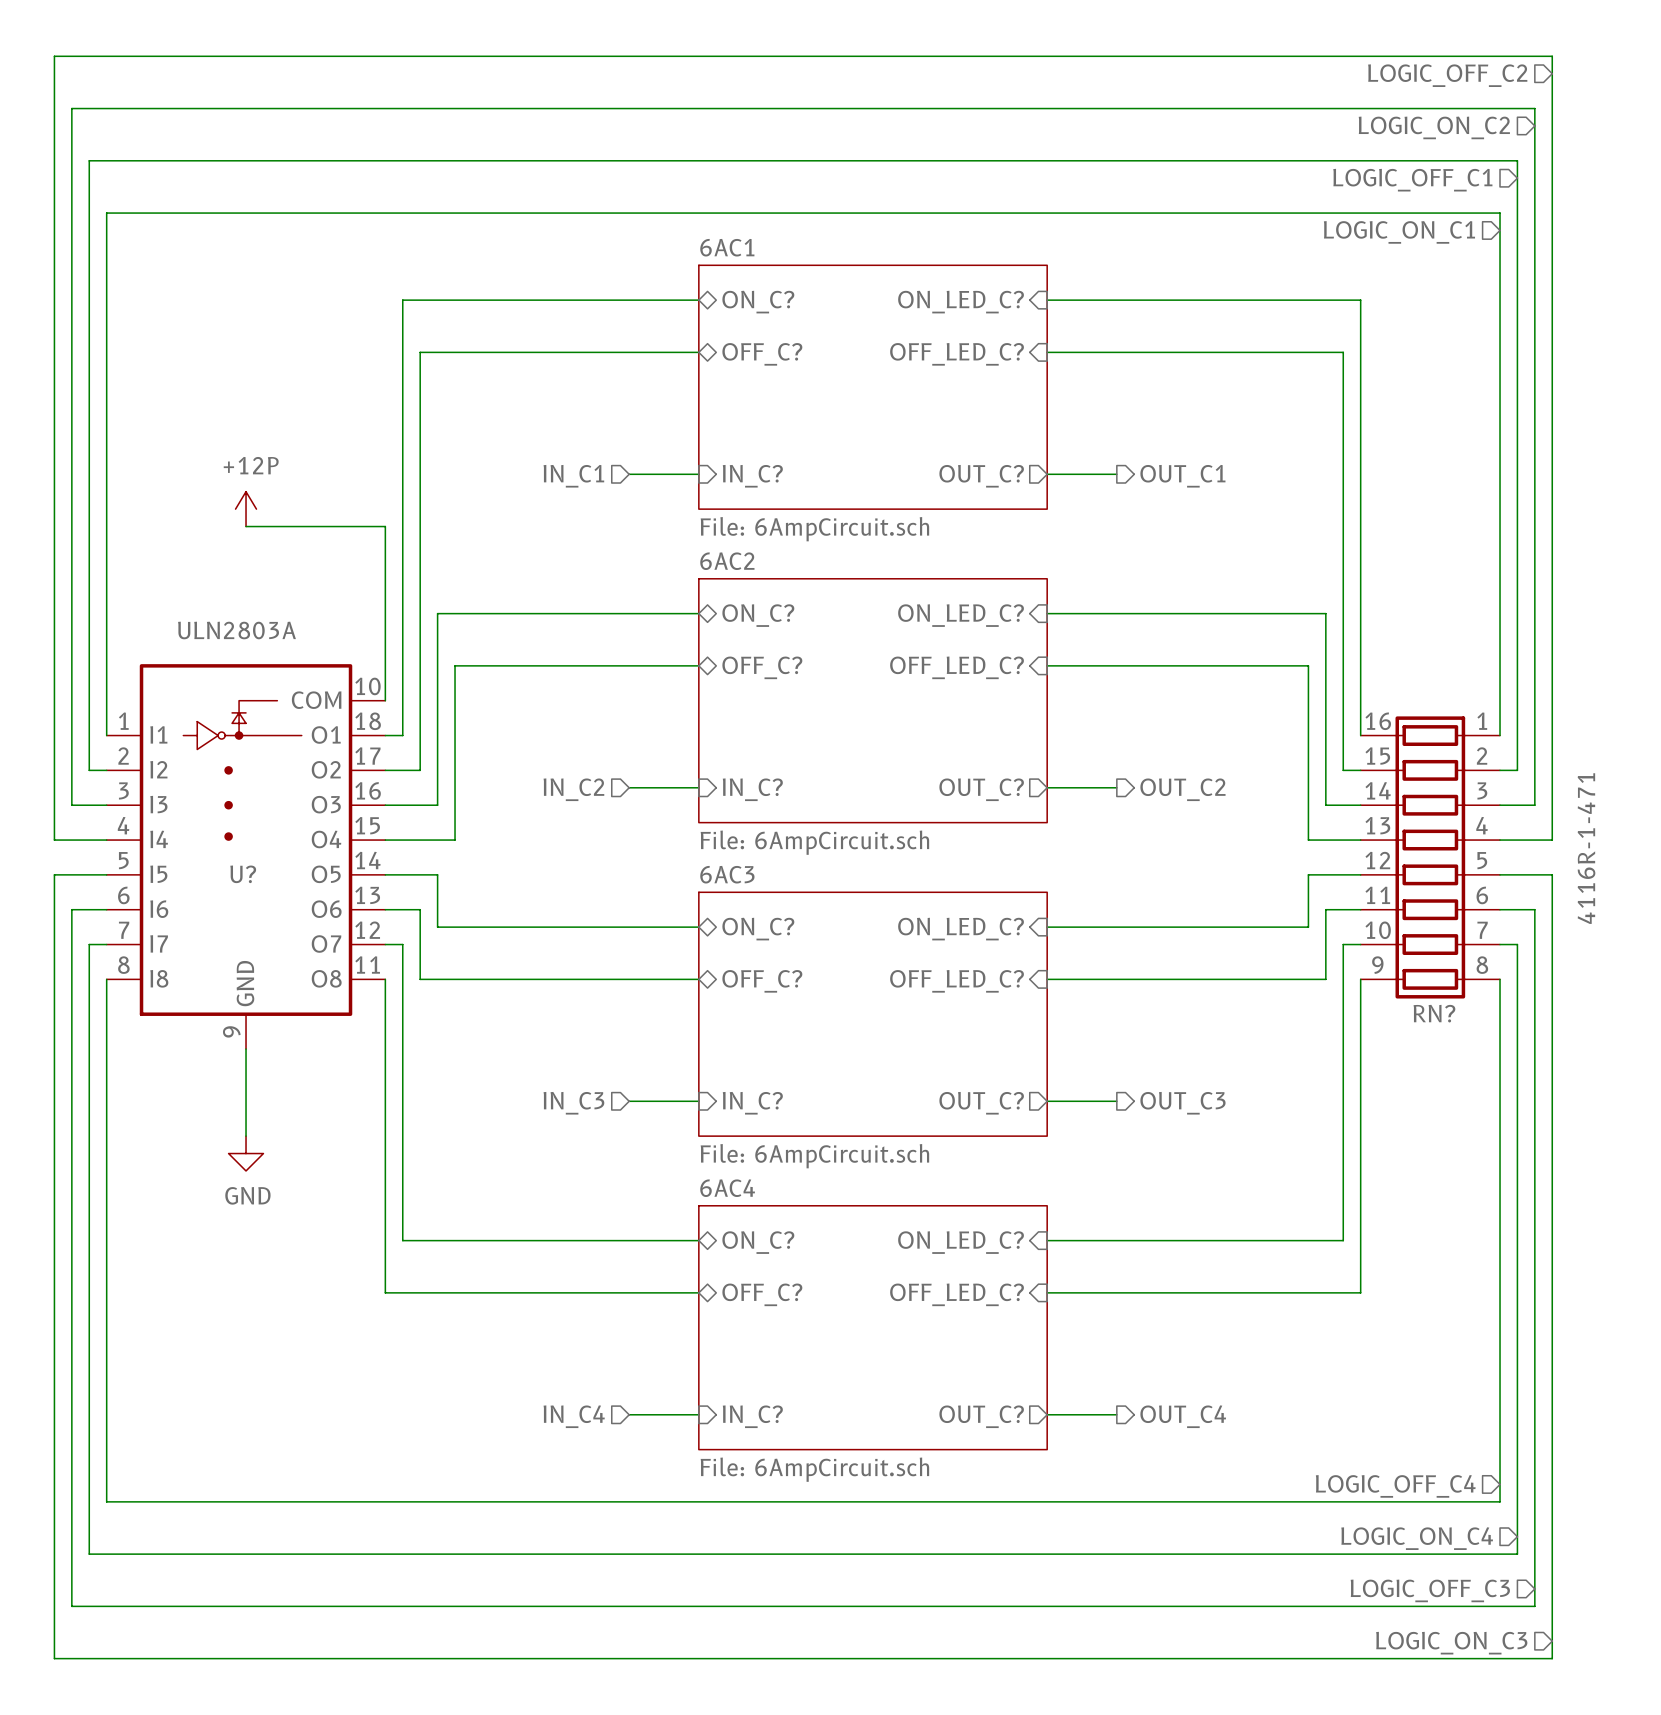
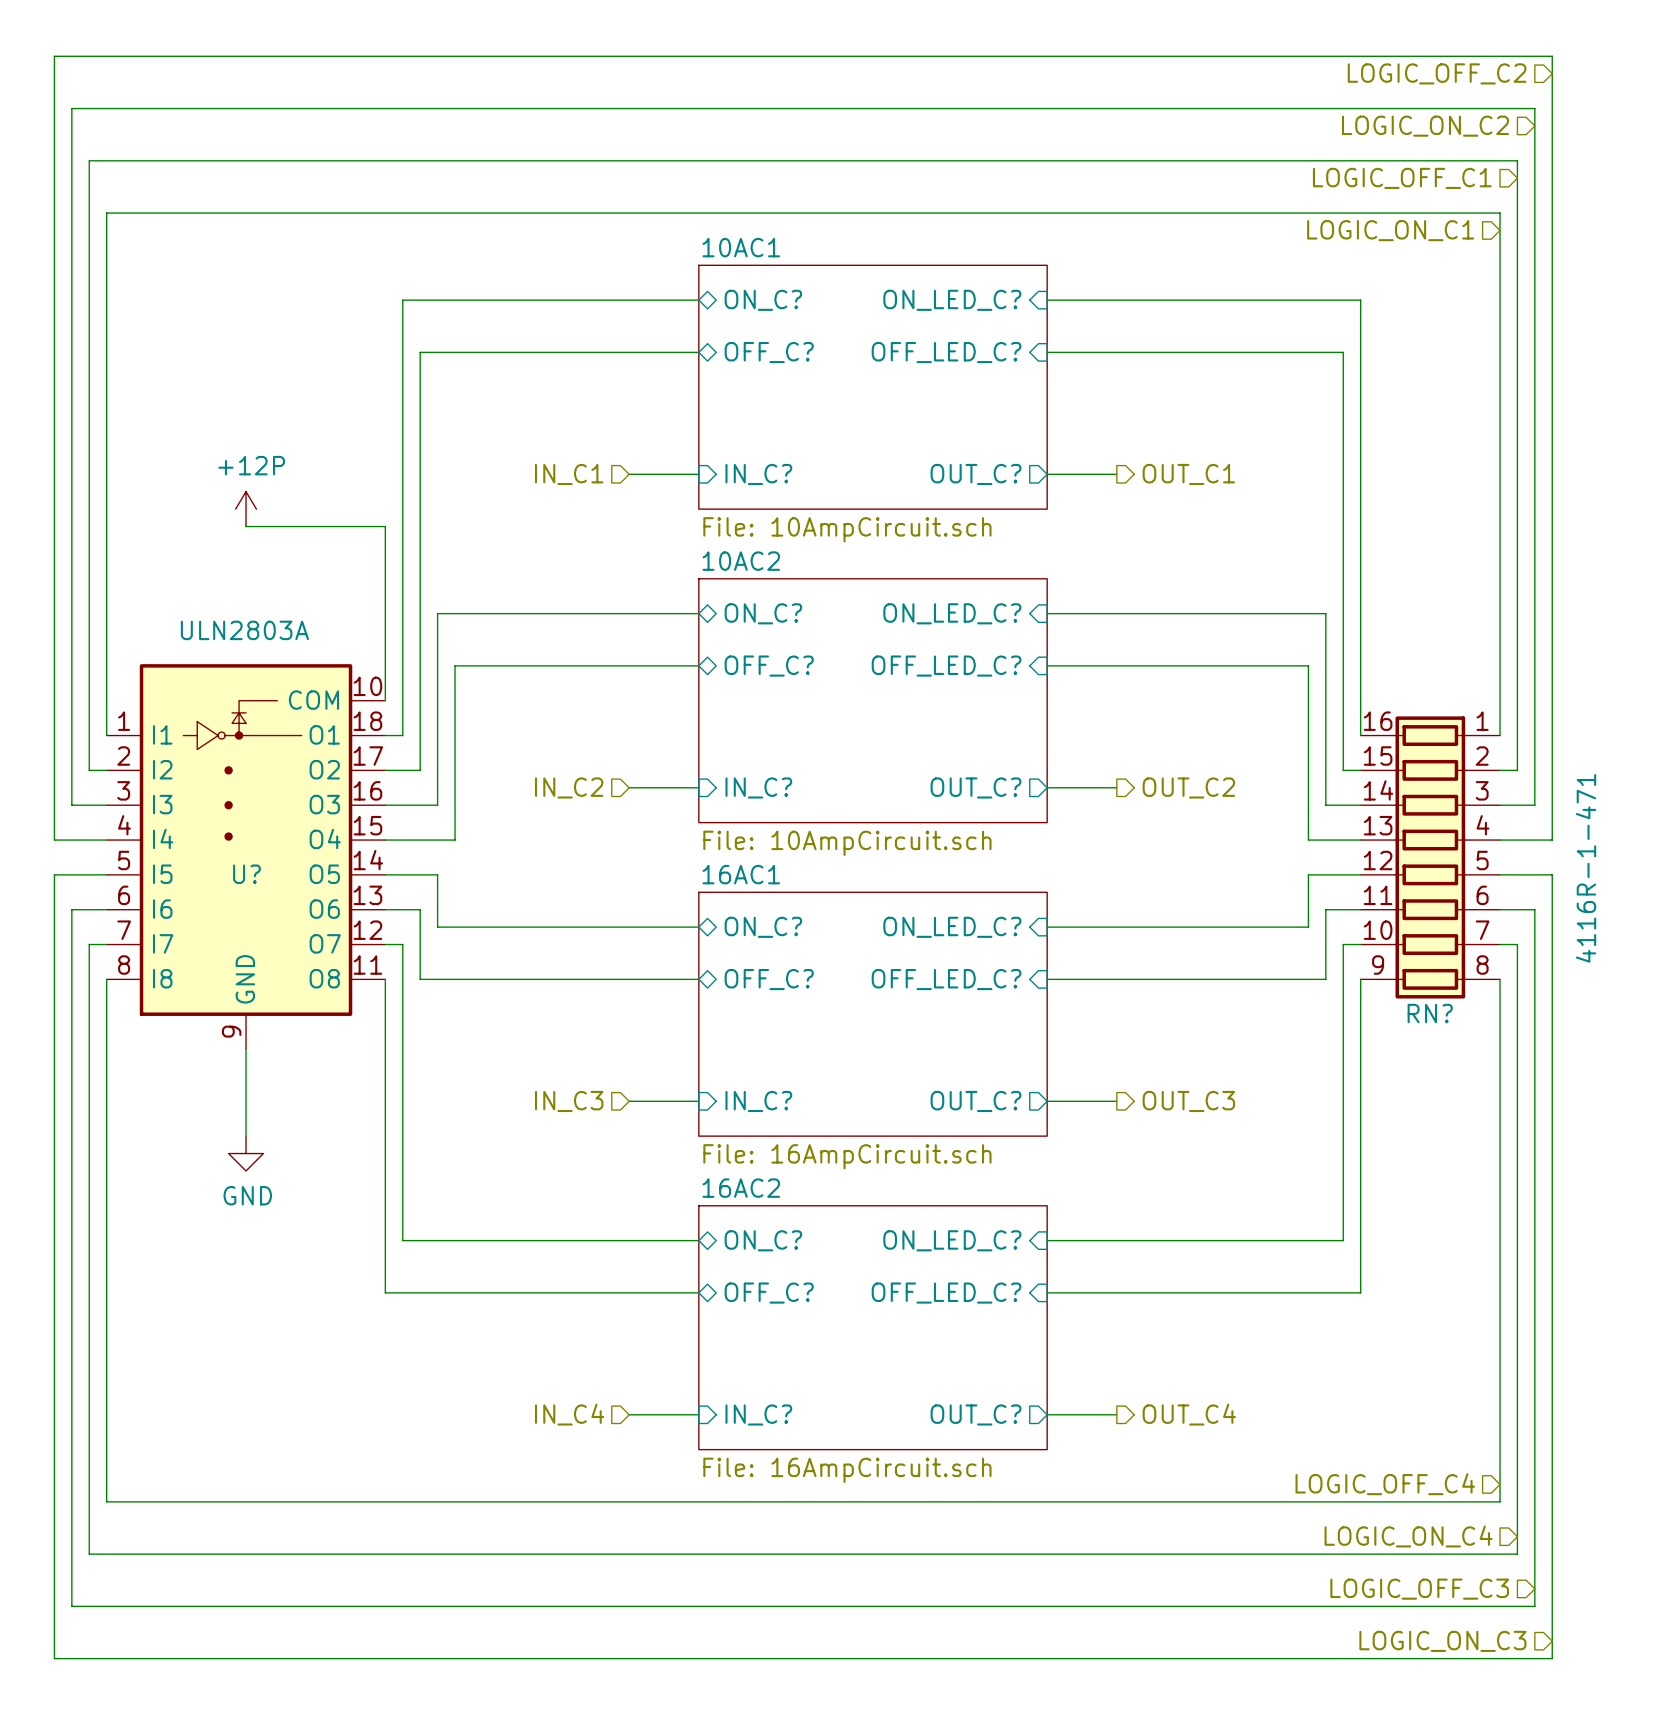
sheet 6AC1 name: 6AC1 (727, 247) -> 10AC1 (741, 247)
sheet 6AC1 value: File: 6AmpCircuit.sch (814, 529) -> File: 10AmpCircuit.sch (847, 529)
sheet 6AC2 name: 6AC2 (727, 561) -> 10AC2 (741, 561)
sheet 6AC2 value: File: 6AmpCircuit.sch (814, 842) -> File: 10AmpCircuit.sch (847, 843)
sheet 6AC3 name: 6AC3 (727, 874) -> 16AC1 (741, 874)
sheet 6AC3 value: File: 6AmpCircuit.sch (814, 1156) -> File: 16AmpCircuit.sch (847, 1156)
sheet 6AC4 name: 6AC4 (727, 1188) -> 16AC2 (741, 1188)
sheet 6AC4 value: File: 6AmpCircuit.sch (814, 1469) -> File: 16AmpCircuit.sch (847, 1470)

